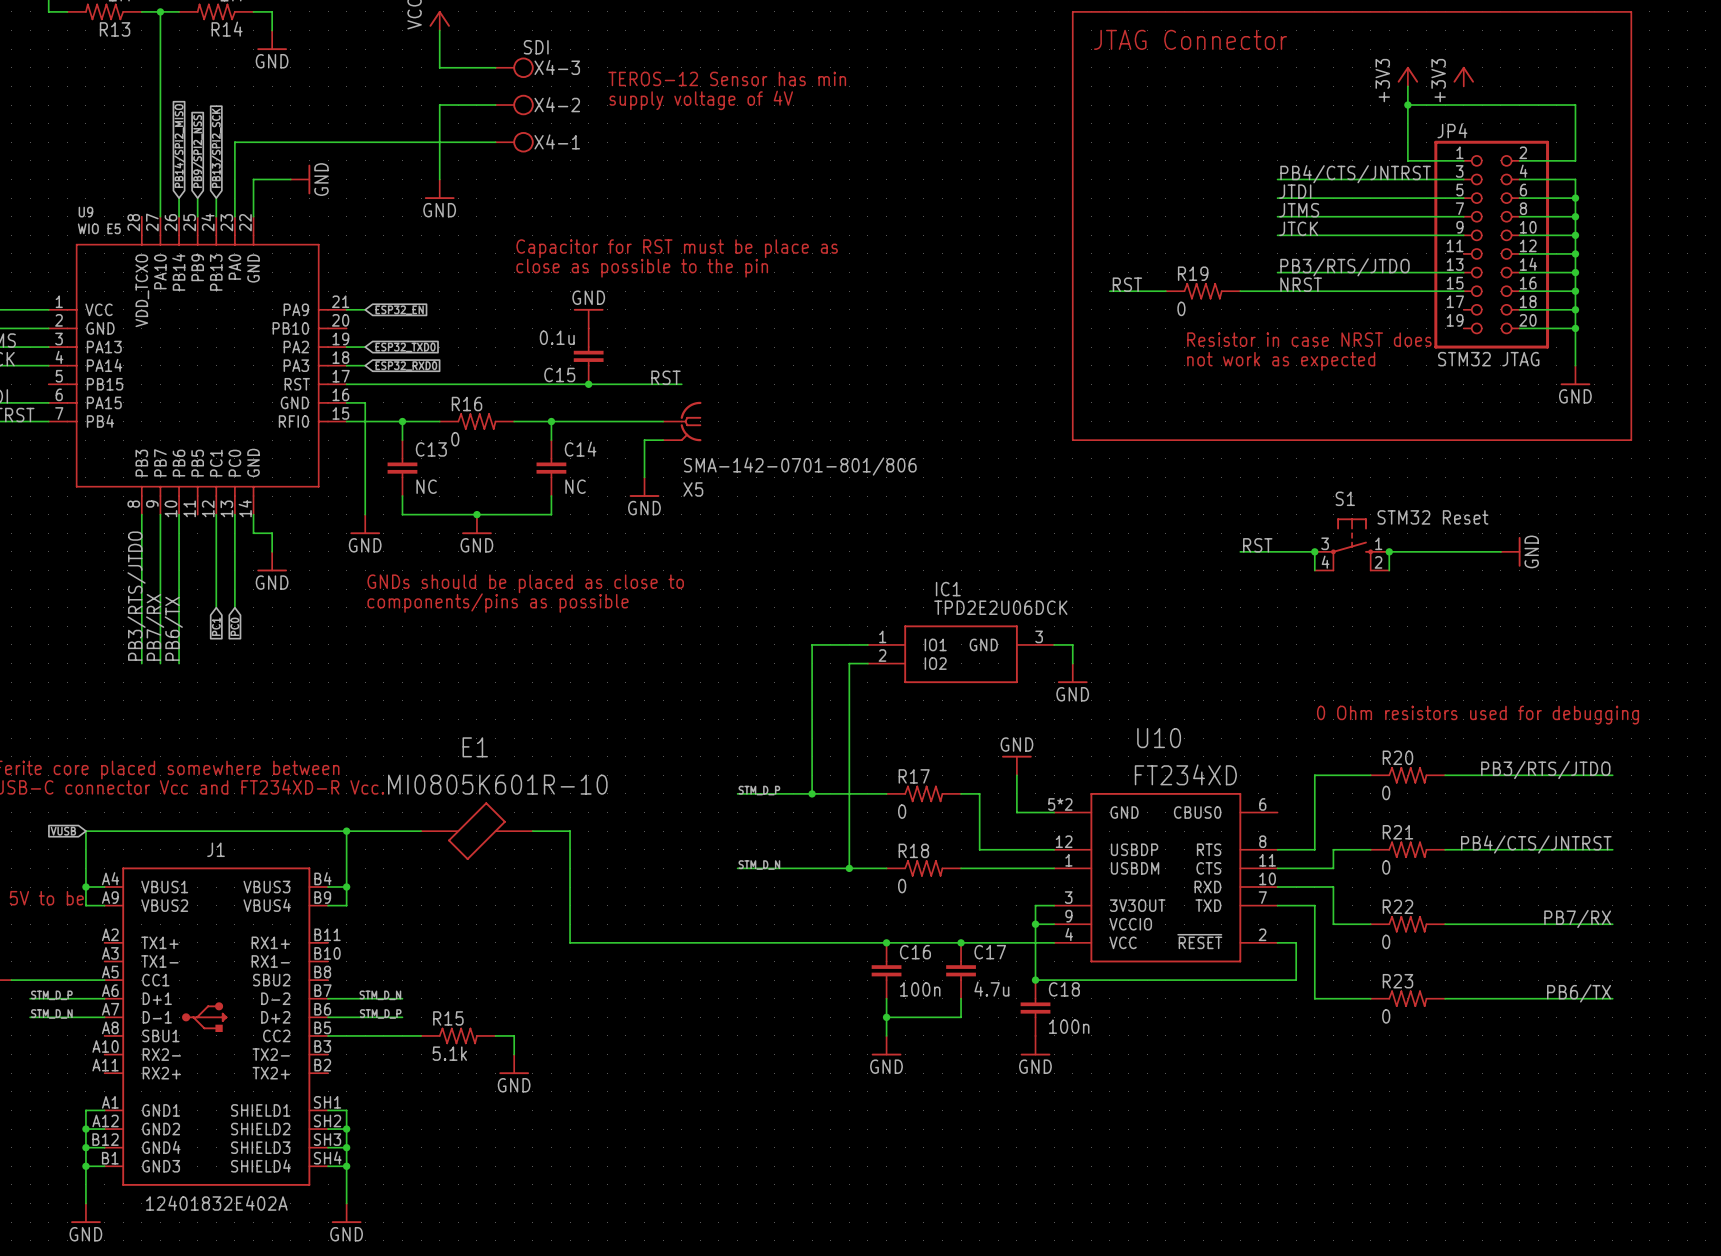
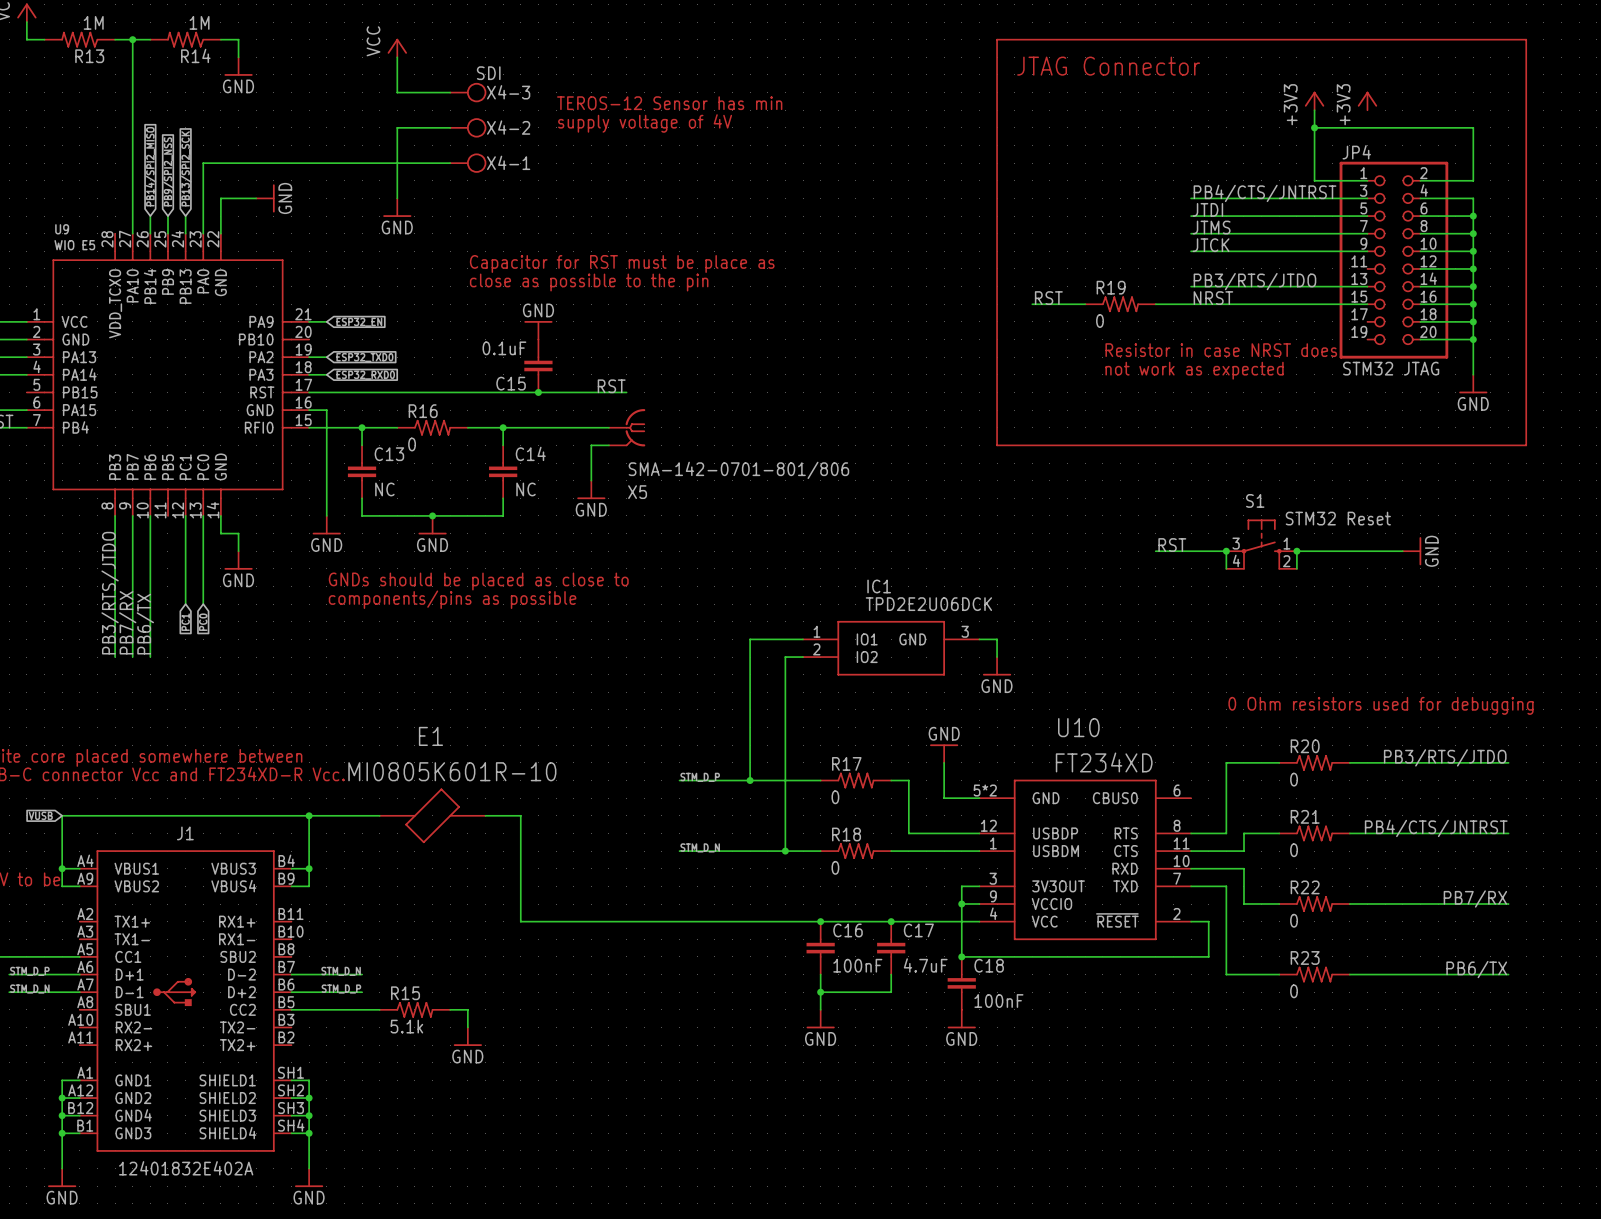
C15 value: 0.1u (557, 337) -> 0.1uF (504, 348)
C16 value: 100n (920, 989) -> 100nF (857, 965)
C17 value: 4.7u (991, 989) -> 4.7uF (925, 965)
C18 value: 100n (1069, 1026) -> 100nF (998, 1001)

